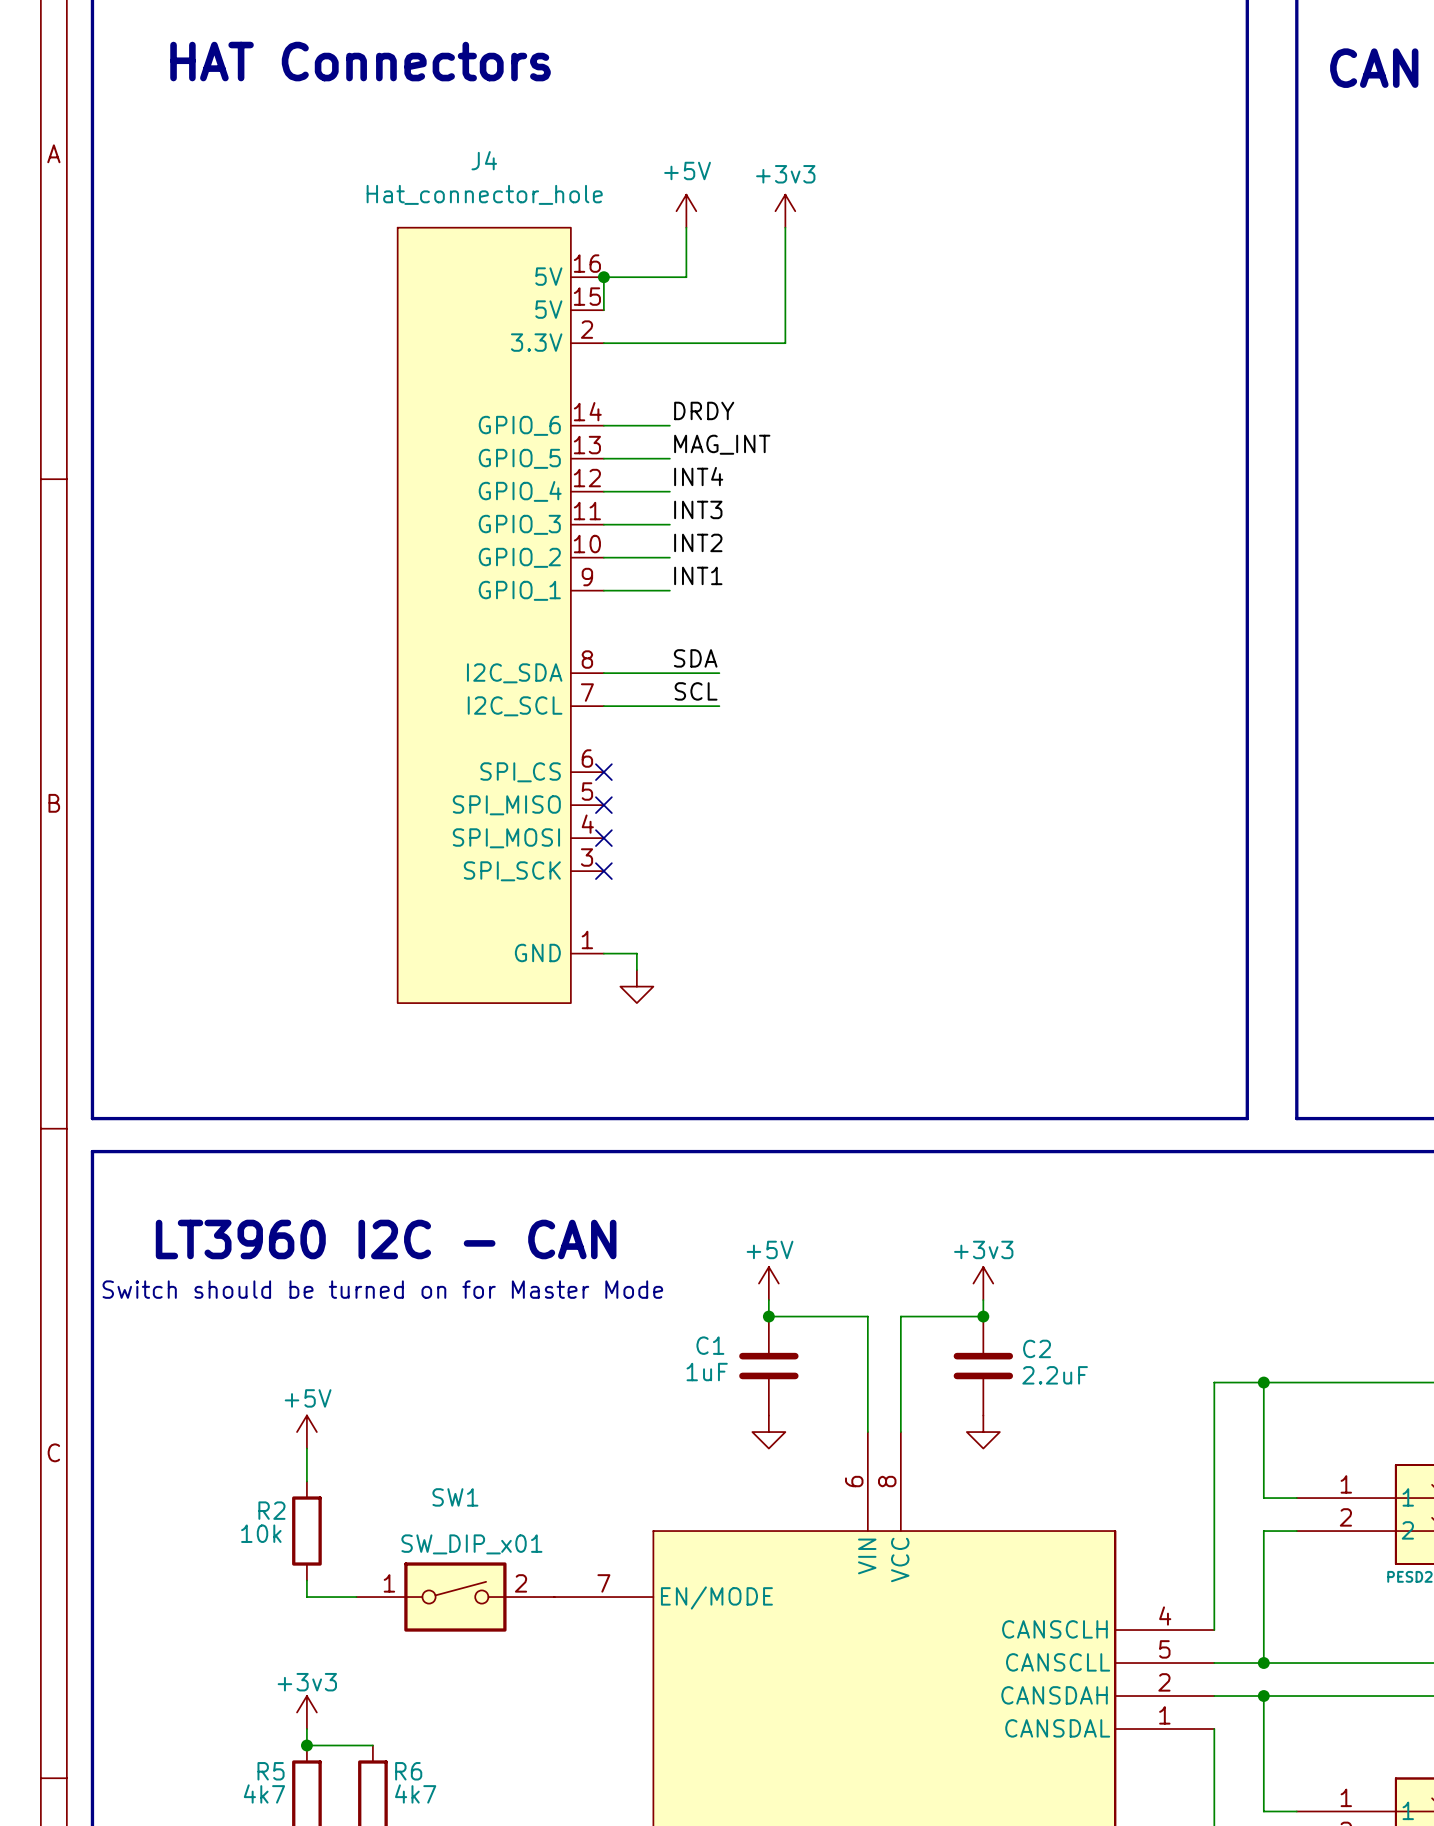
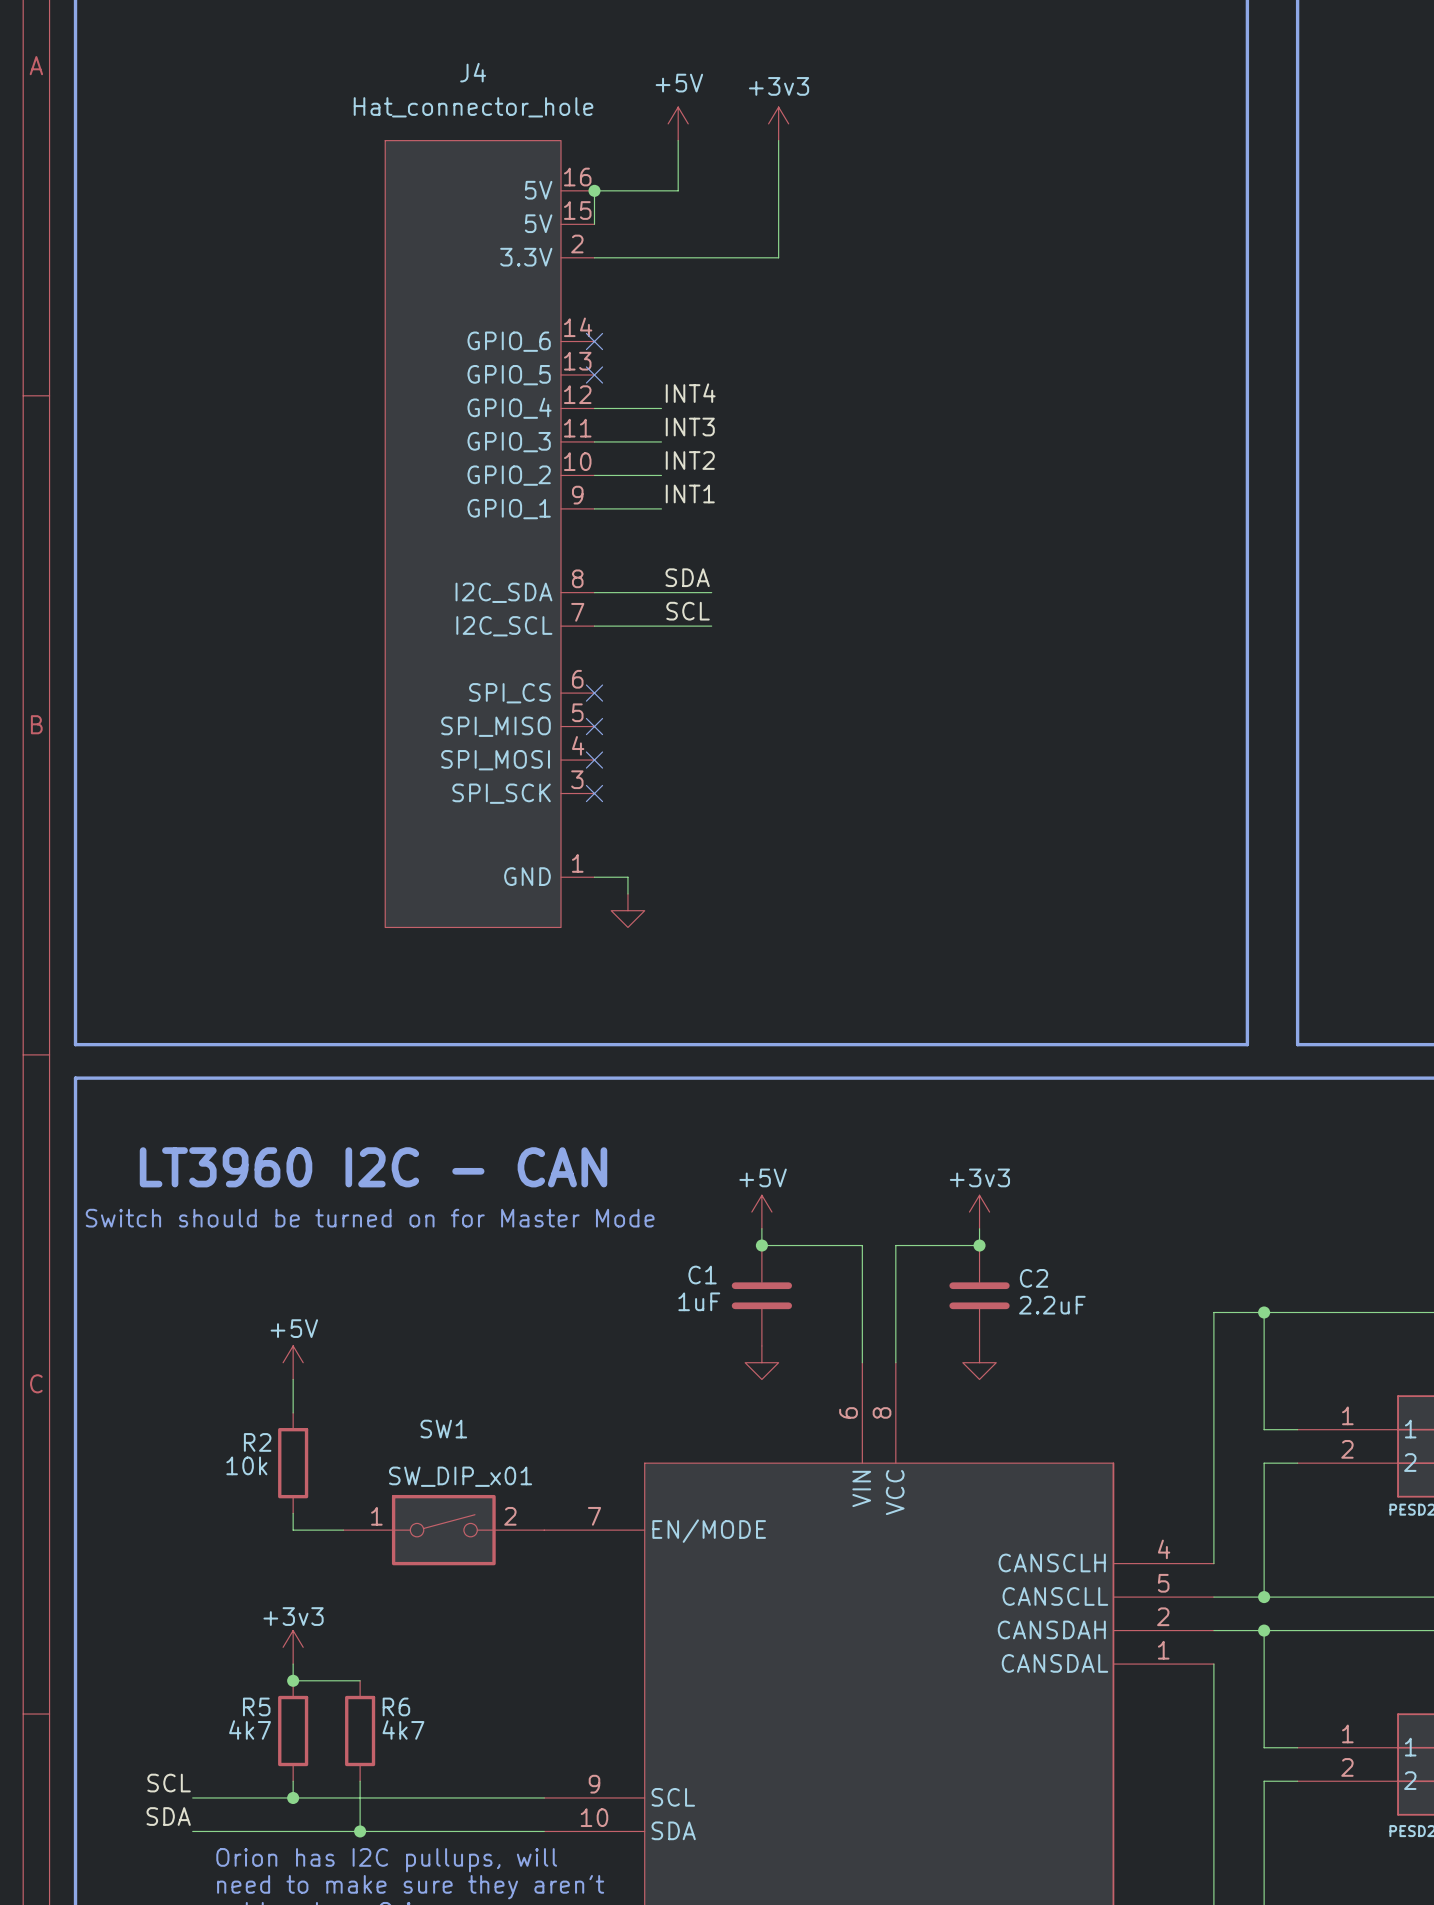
label: DRDY (704, 410) -> none
wire: (603, 425) (669, 425) -> none
no-connect mark: none -> (594, 341)
label: MAG_INT (722, 444) -> none
wire: (603, 458) (669, 458) -> none
no-connect mark: none -> (594, 375)

